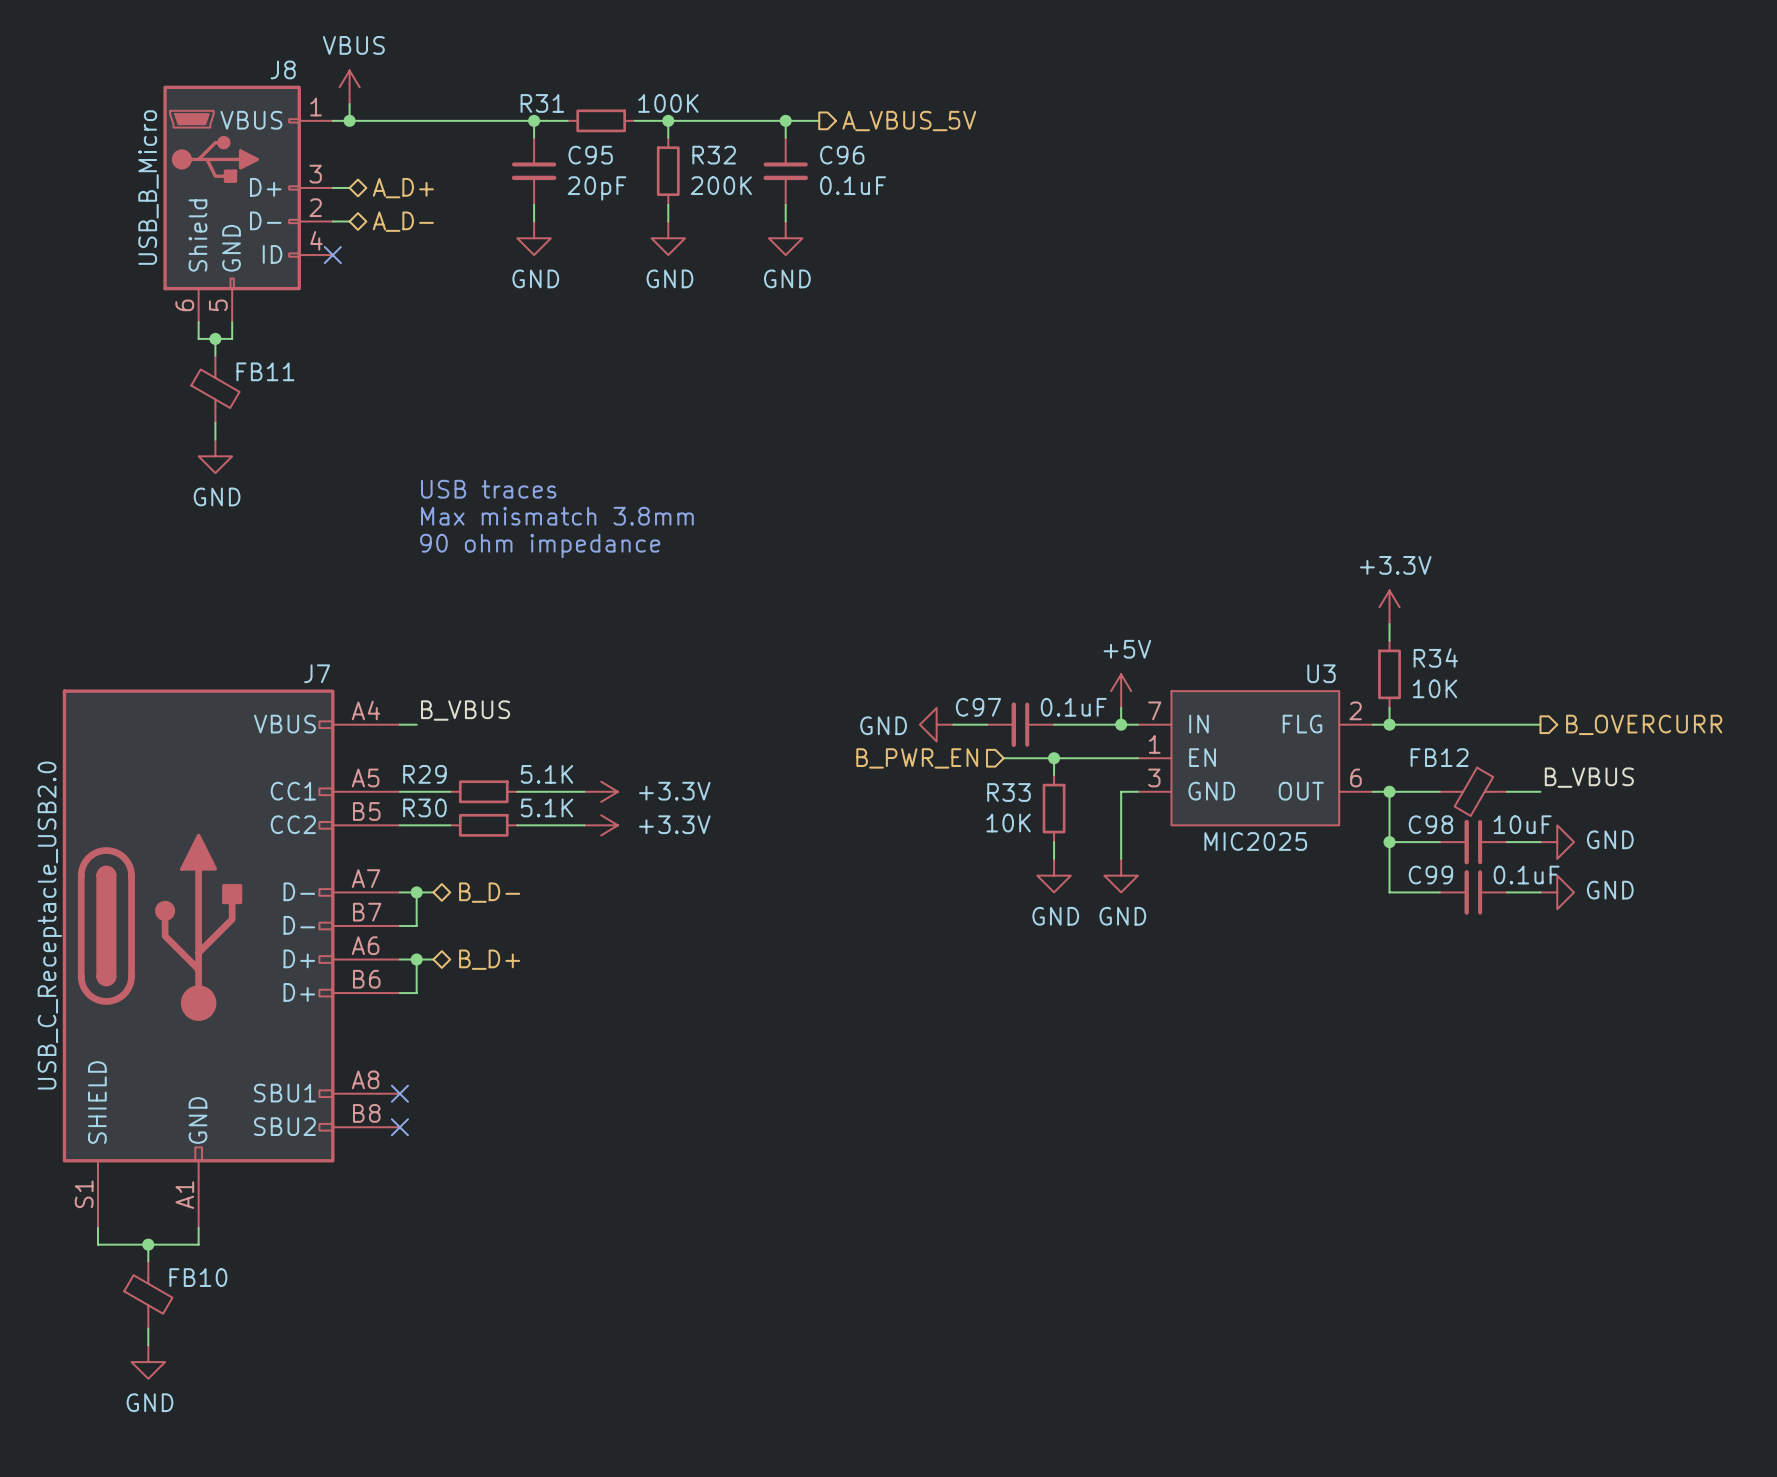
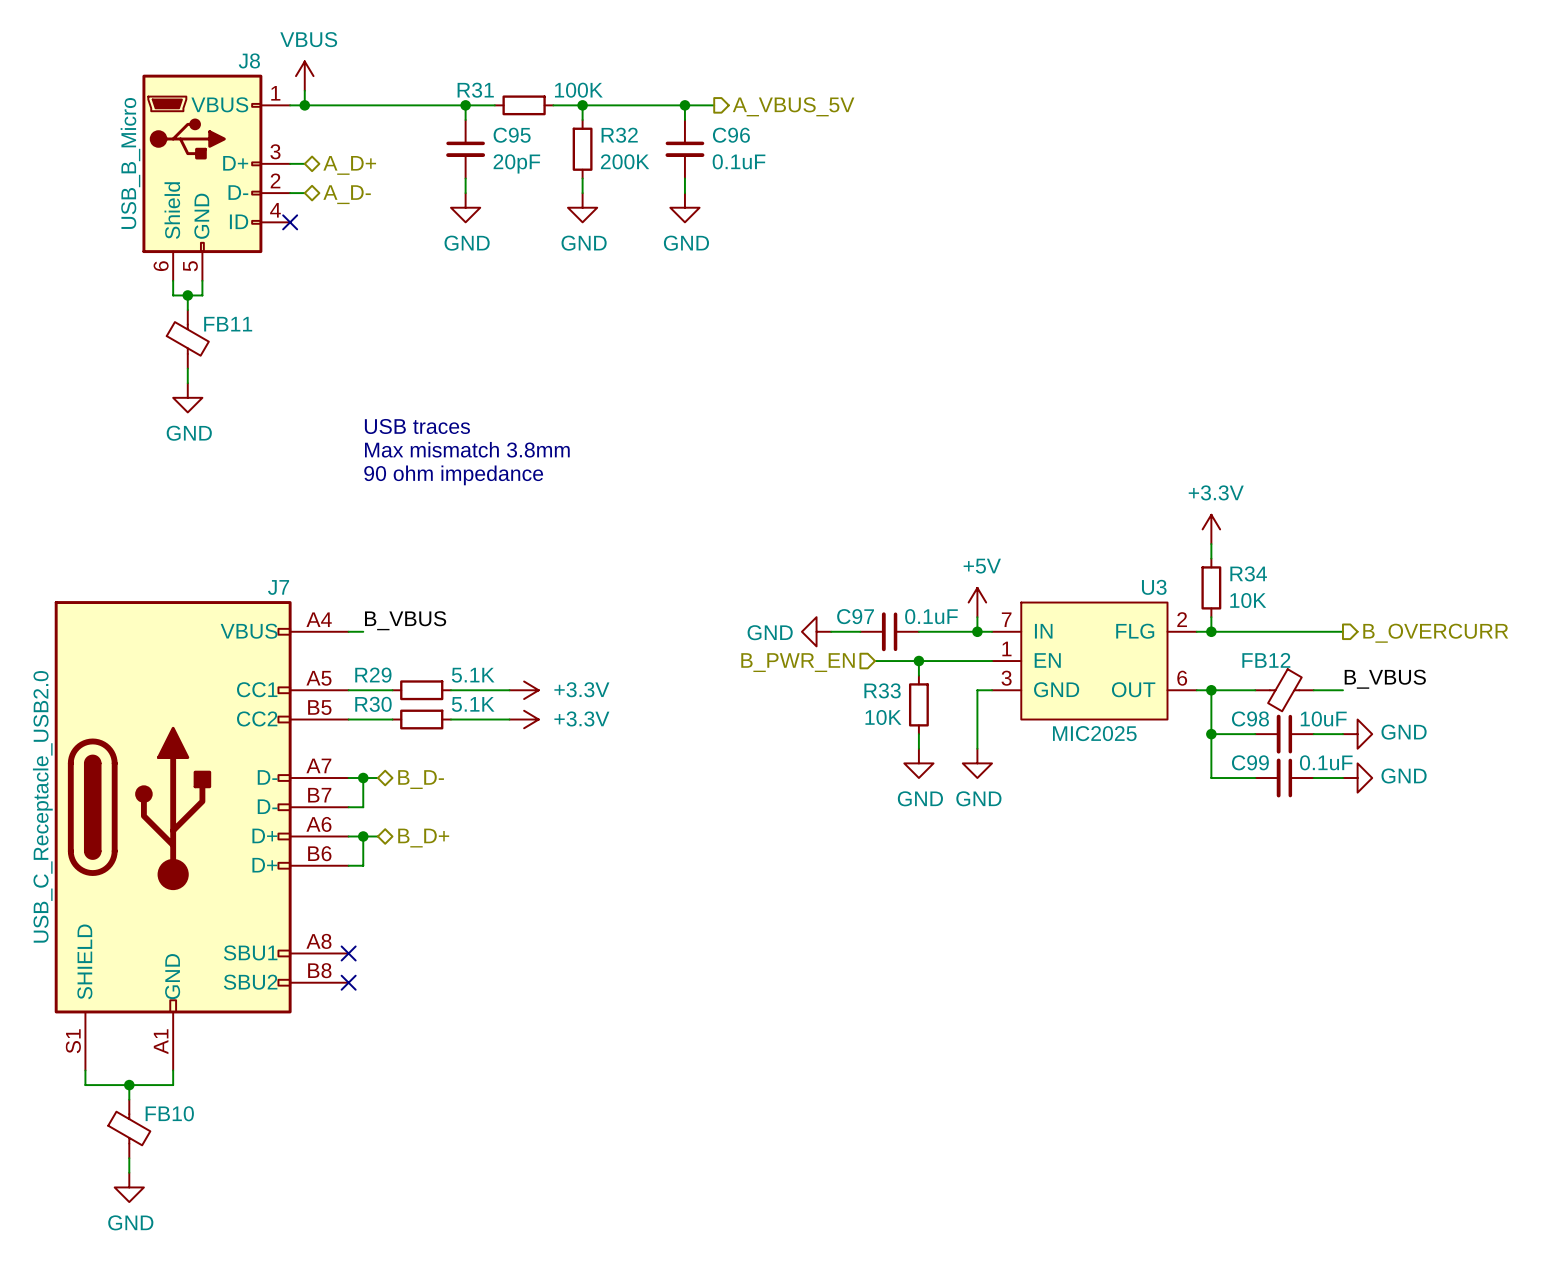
FB12 name position: FB12 (1439, 757) -> FB12 (1266, 660)

